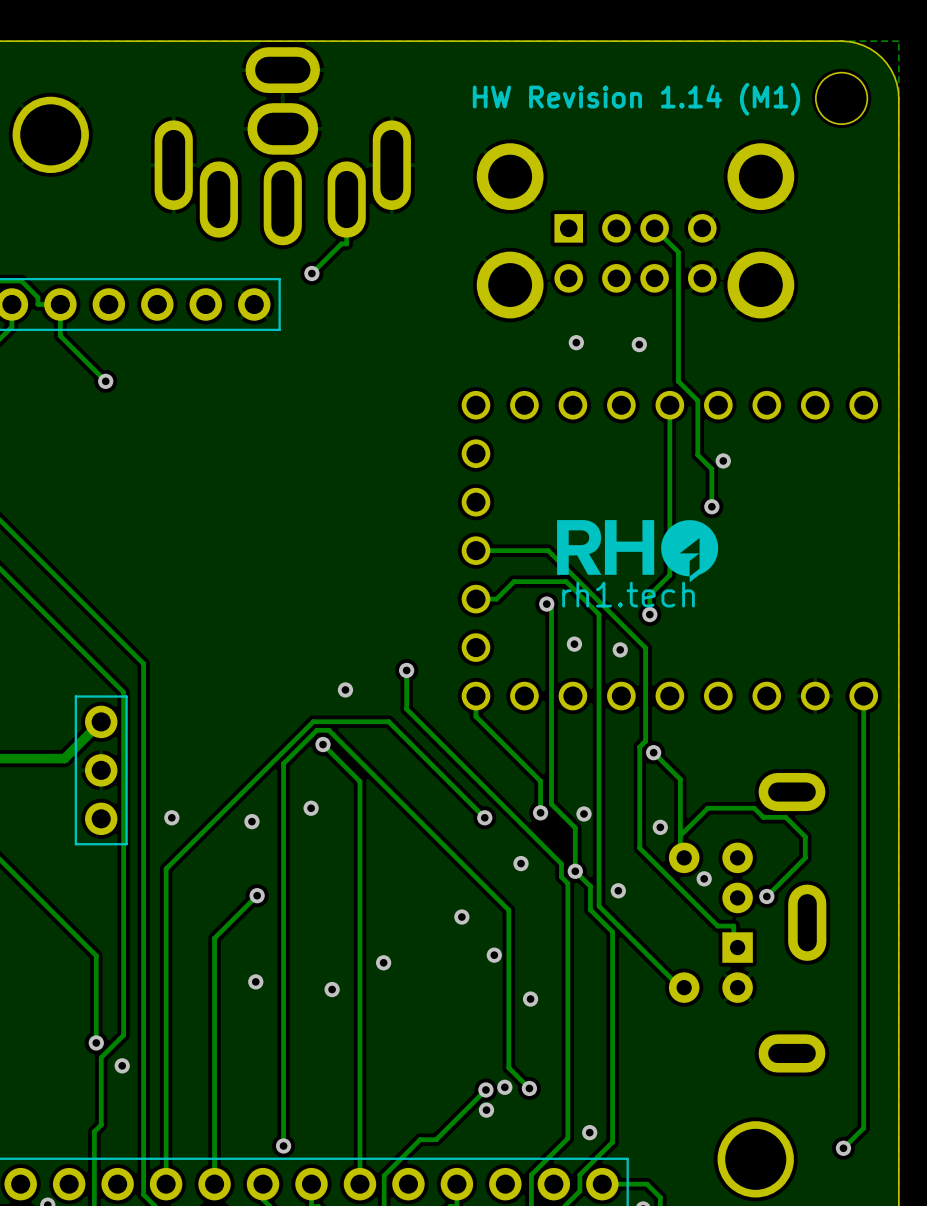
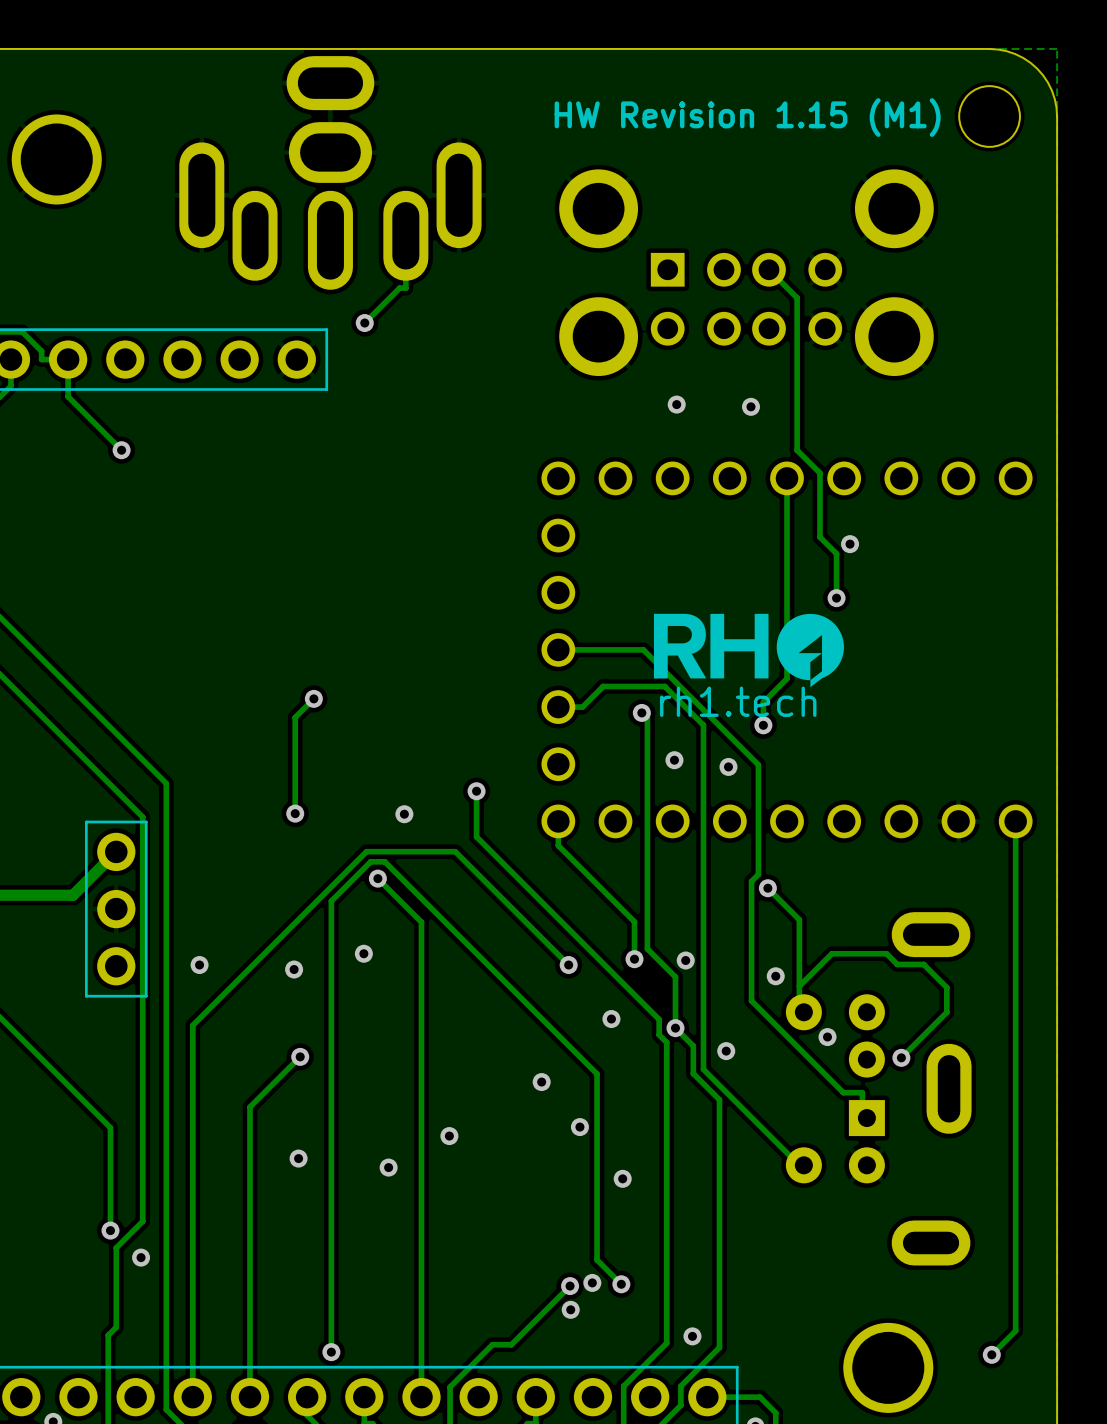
text: HW Revision 1.14 (M1) (636, 99) -> HW Revision 1.15 (M1) (747, 117)
track: none -> (313, 698) (295, 717) (295, 813)
via: none -> (313, 698)
via: none -> (295, 813)

